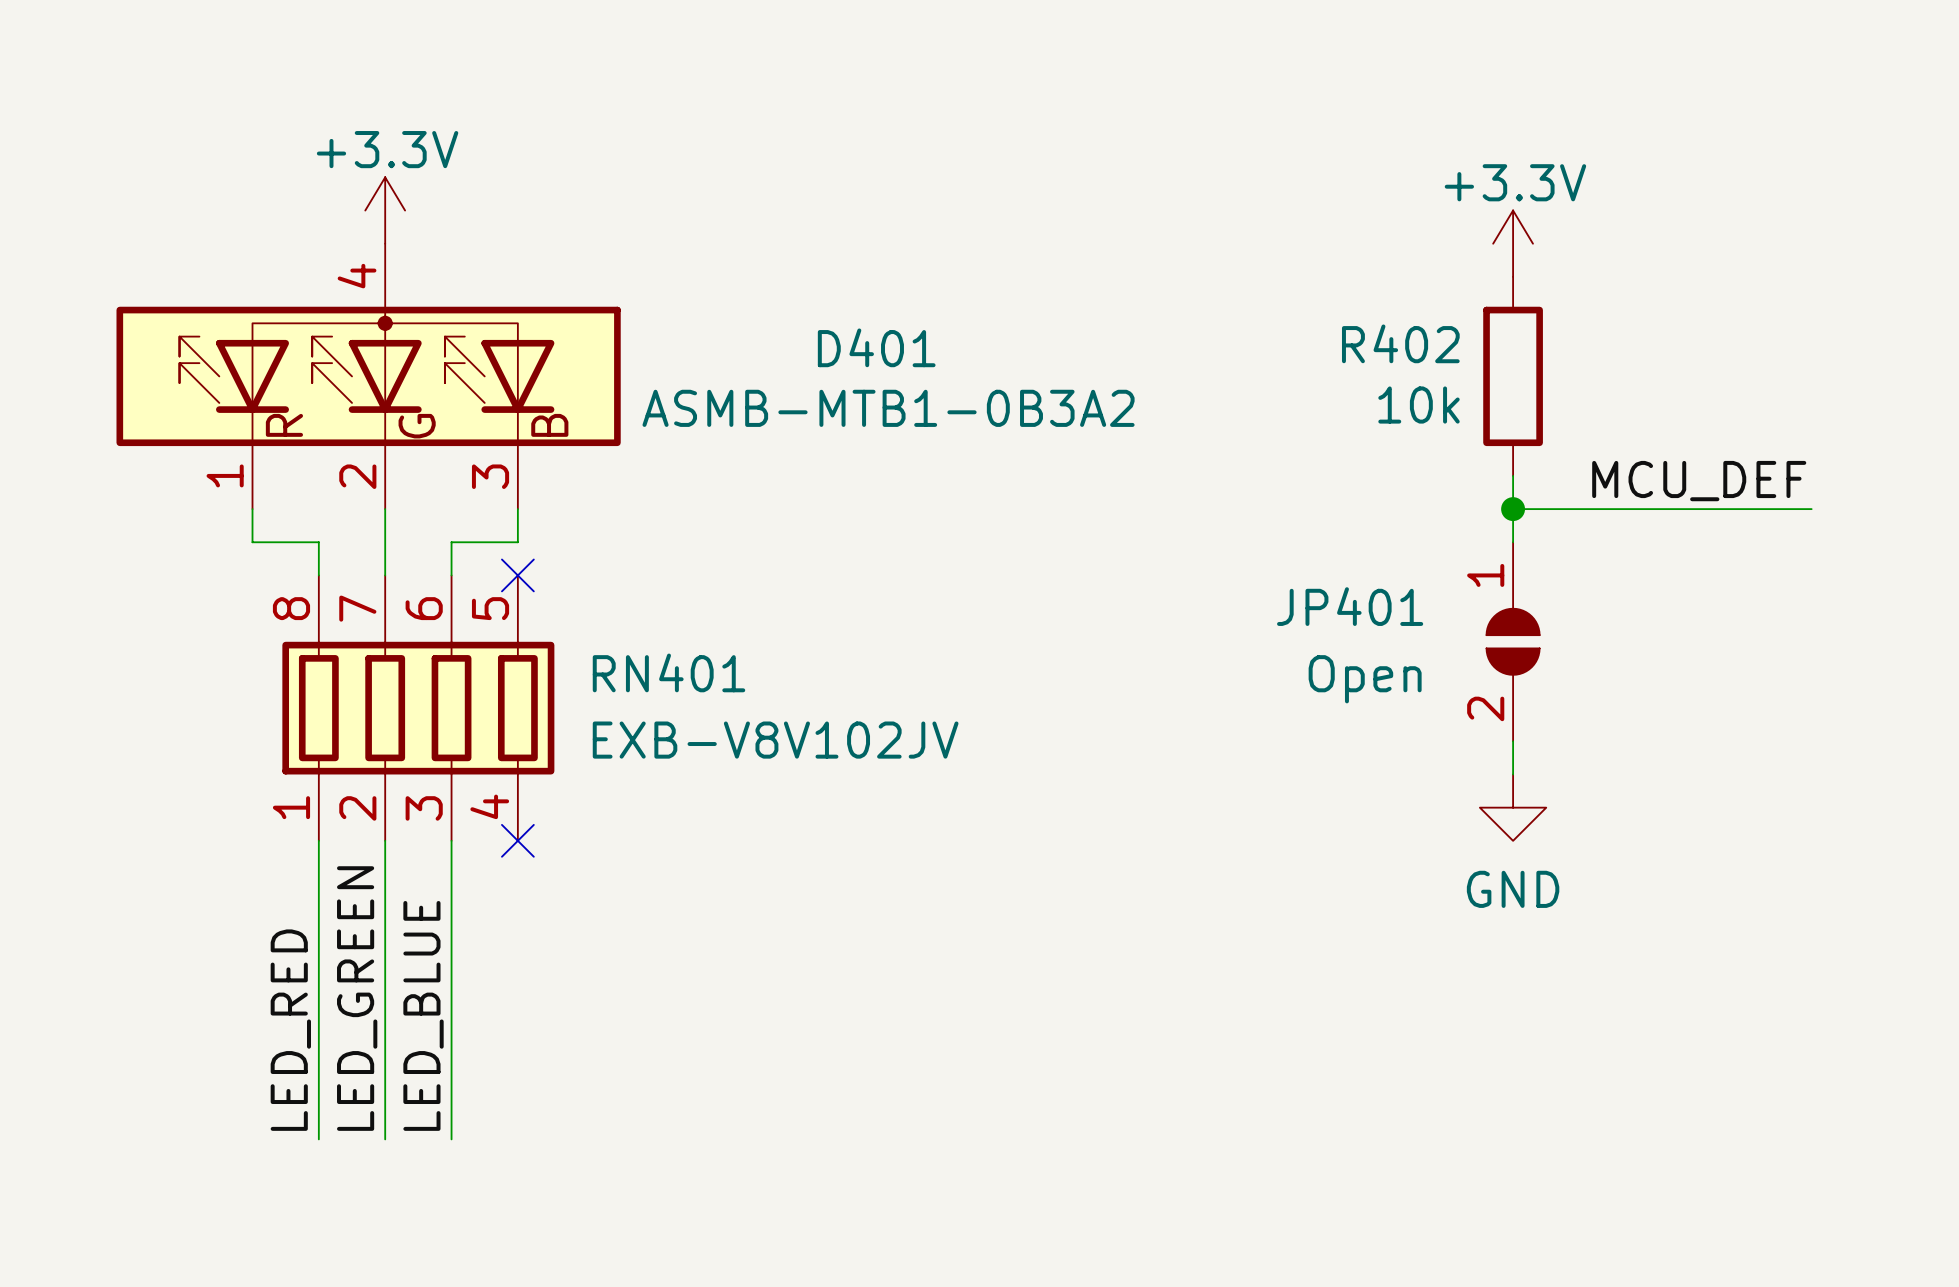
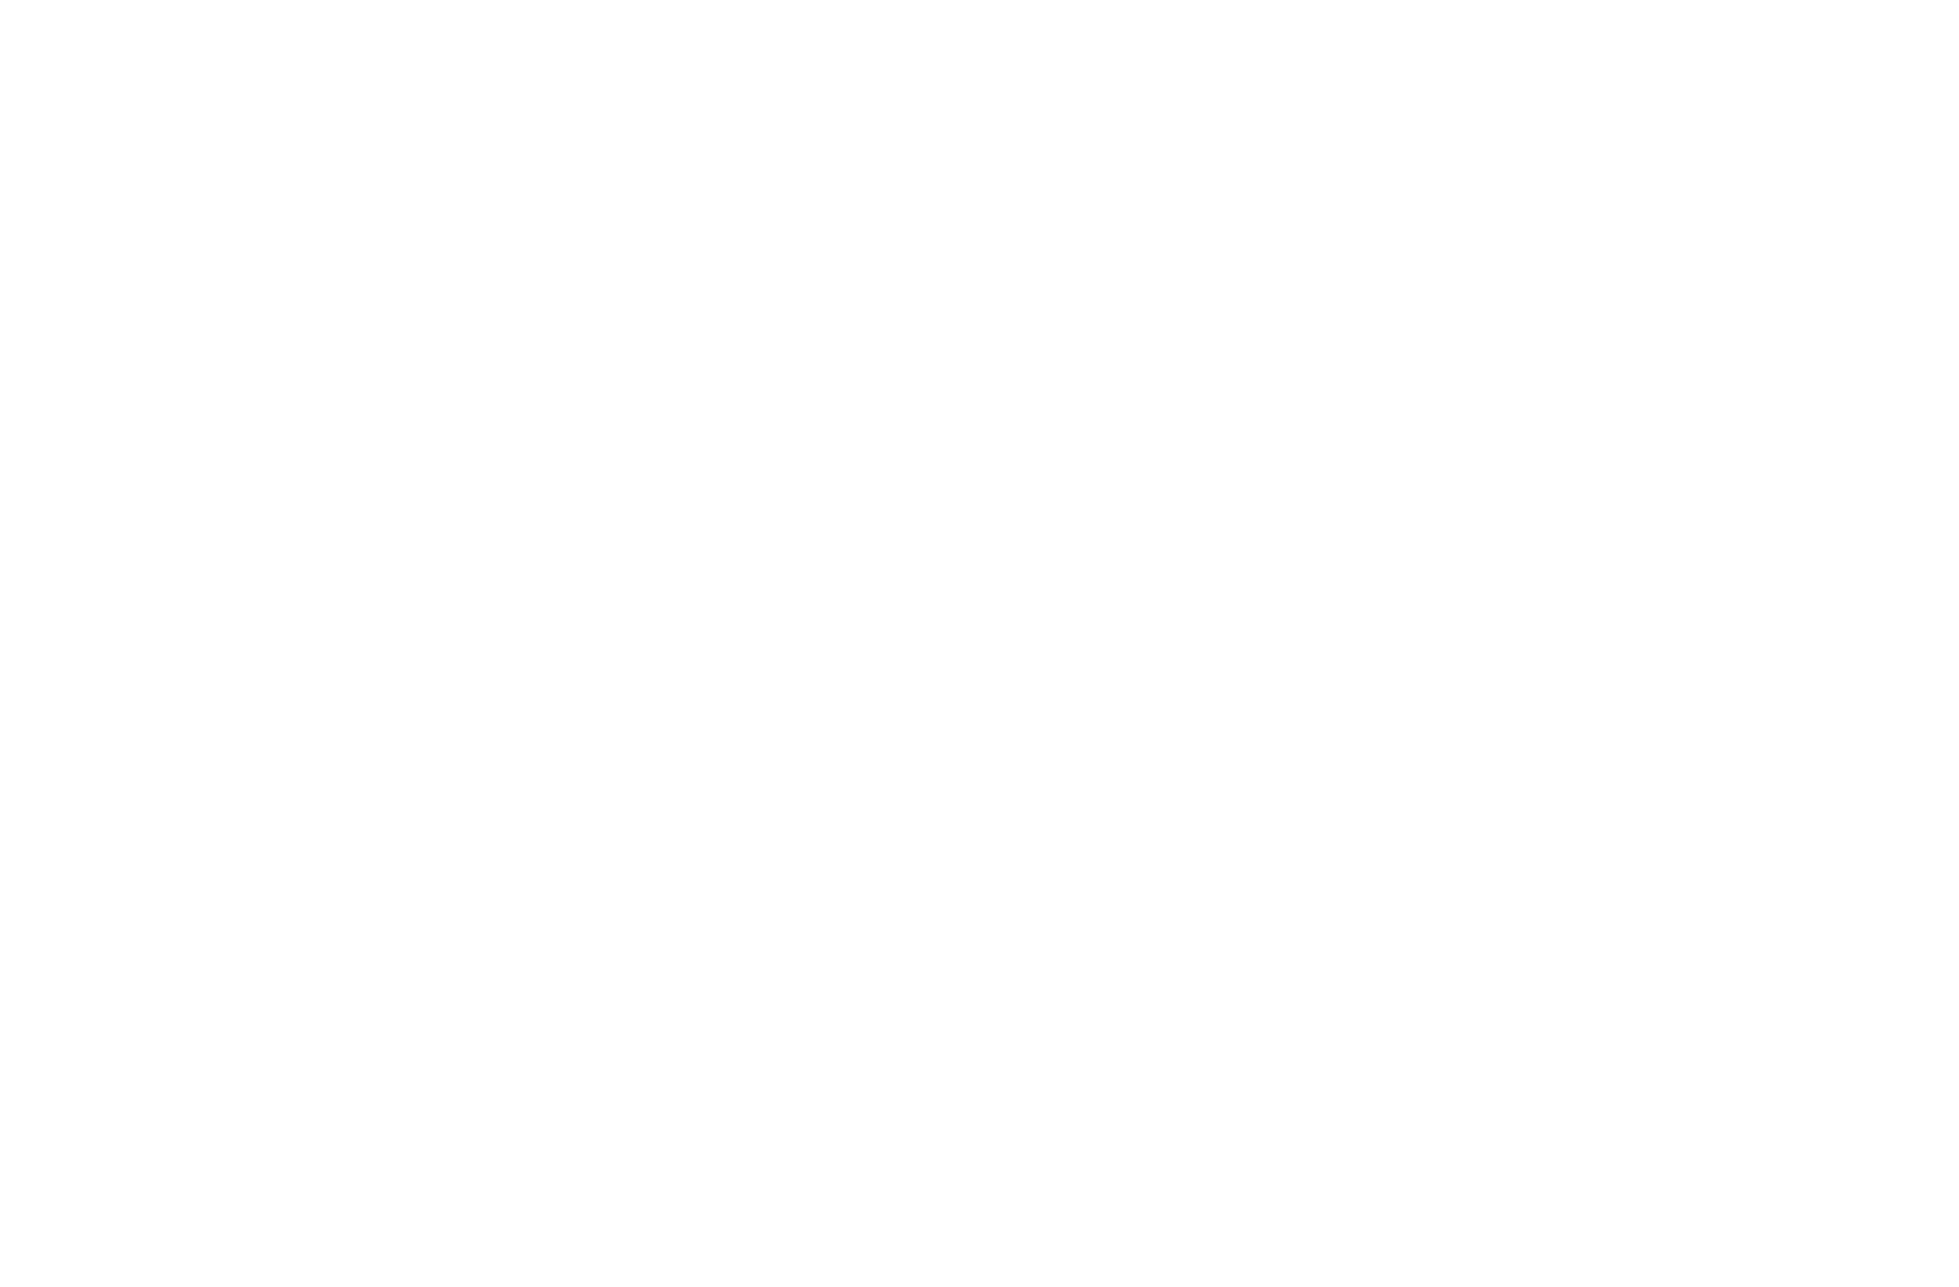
power symbol: +3.3V (385, 210) -> none
power symbol: +3.3V (1513, 243) -> none
D401: ASMB-MTB1-0B3A2 (368, 376) -> none
R402: 10k (1513, 376) -> none
wire: (1513, 475) (1513, 542) -> none
label: MCU_DEF (1699, 481) -> none
wire: (252, 509) (252, 542) (318, 542) (318, 575) -> none
wire: (385, 509) (385, 575) -> none
wire: (517, 509) (517, 542) (451, 542) (451, 575) -> none
wire: (1513, 509) (1811, 509) -> none
junction: (1513, 509) -> none
no-connect mark: (517, 575) -> none
JP401: Open (1513, 641) -> none
RN401: EXB-V8V102JV (418, 708) -> none
wire: (1513, 741) (1513, 774) -> none
power symbol: GND (1513, 807) -> none
wire: (318, 840) (318, 1139) -> none
wire: (385, 840) (385, 1139) -> none
wire: (451, 840) (451, 1139) -> none
no-connect mark: (517, 840) -> none
label: LED_GREEN (357, 998) -> none
label: LED_BLUE (423, 1015) -> none
label: LED_RED (290, 1030) -> none

